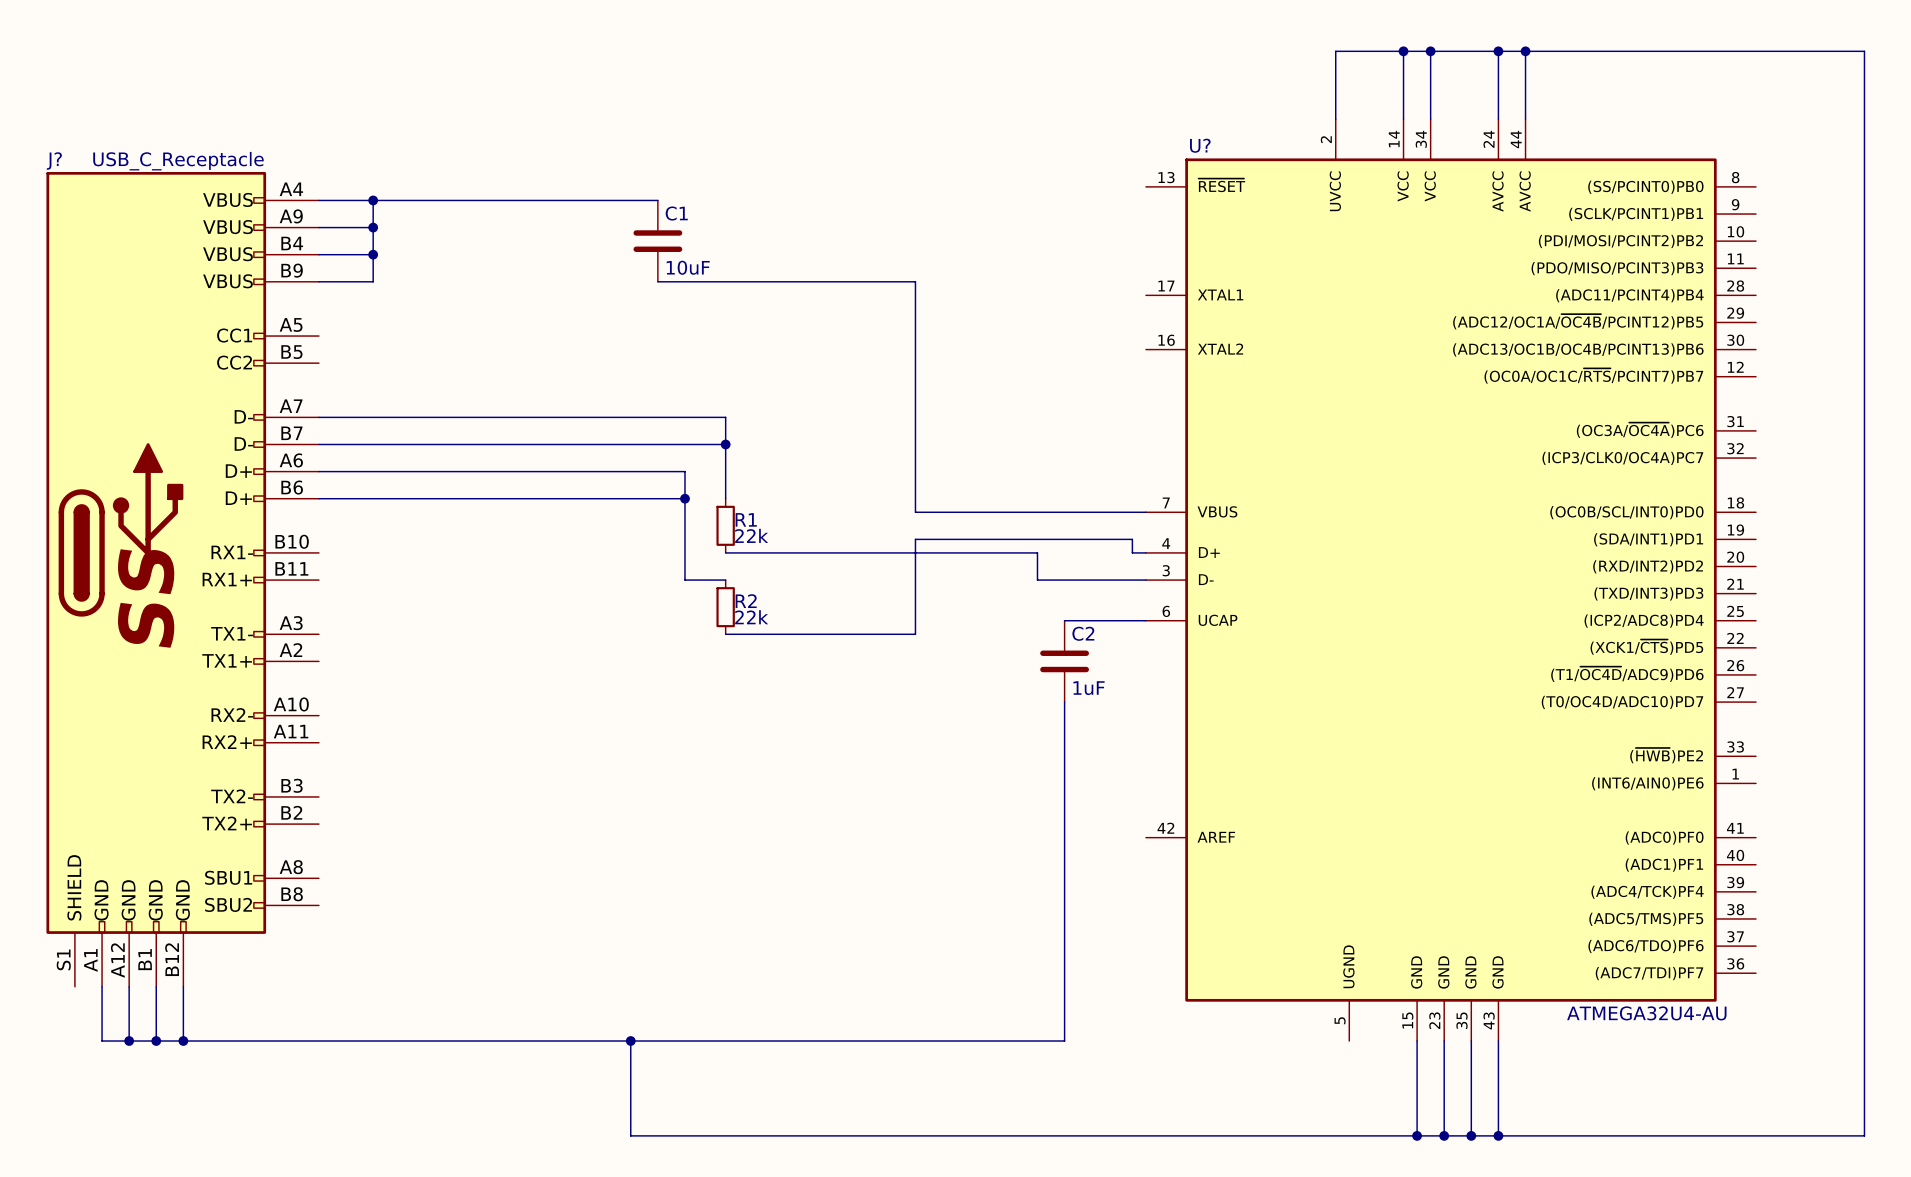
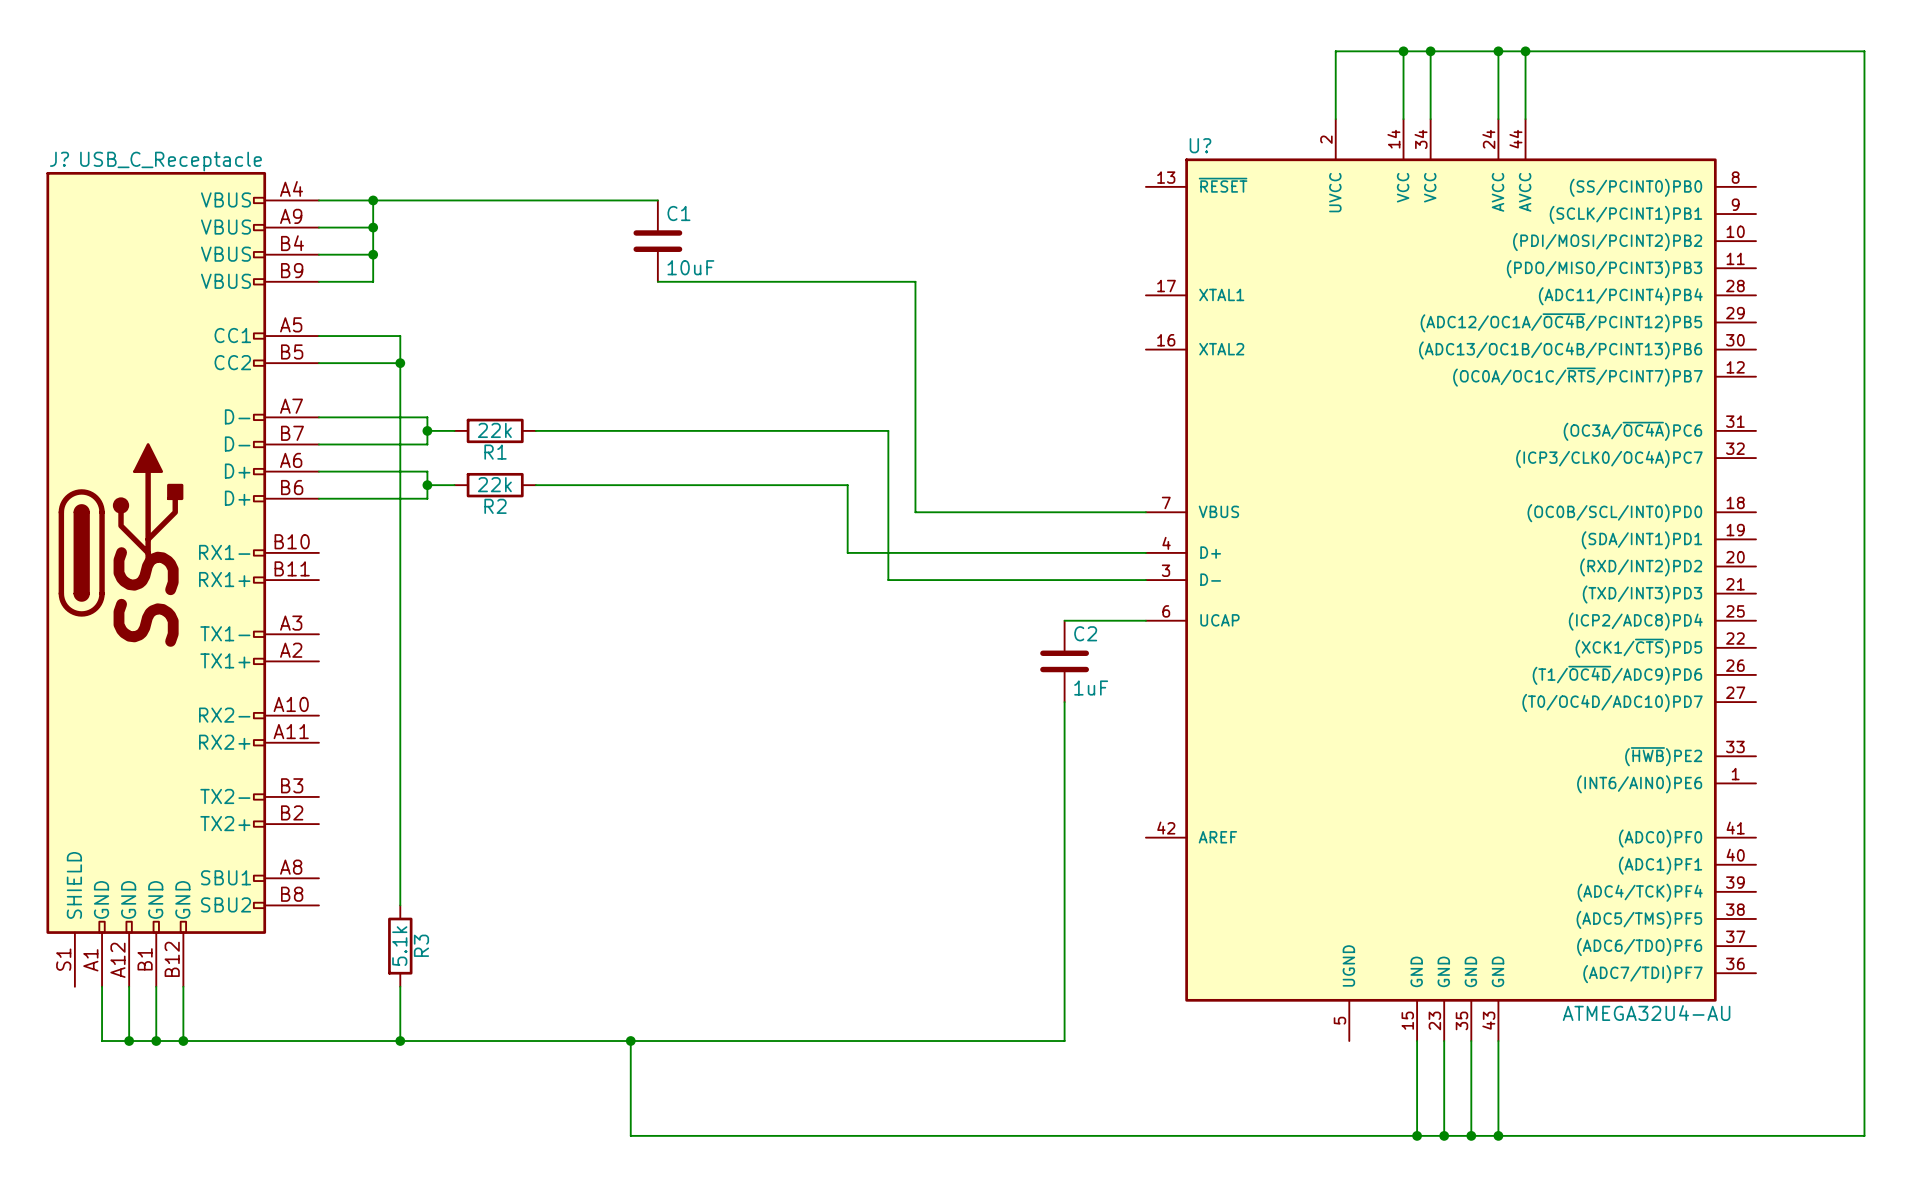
wire: none -> (318, 336) (400, 336) (400, 905)
wire: none -> (318, 363) (400, 363)
junction: none -> (400, 363)
wire: (427, 417) (725, 417) (725, 498) -> none
wire: none -> (427, 430) (454, 430)
junction: none -> (427, 430)
wire: none -> (535, 430) (888, 430) (888, 580) (1037, 580)
wire: (427, 444) (725, 444) -> (427, 444) (427, 417)
junction: (725, 444) -> none
wire: (427, 471) (684, 471) (684, 580) (725, 580) -> none
wire: none -> (427, 485) (454, 485)
junction: none -> (427, 485)
wire: (427, 498) (684, 498) -> (427, 498) (427, 471)
junction: (684, 498) -> none
R1 symbol: [716, 498, 735, 553] -> [454, 418, 536, 444]
R1 name position: R1 (746, 519) -> R1 (495, 452)
R1 value position: 22k (751, 535) -> 22k (494, 430)
wire: (725, 552) (847, 552) -> (535, 485) (847, 485) (847, 552)
wire: (1037, 552) (1037, 580) -> (1037, 552) (1132, 552)
wire: (1132, 552) (1132, 539) (915, 539) (915, 634) (725, 634) -> none
R2 symbol: [716, 580, 735, 635] -> [454, 472, 536, 498]
R2 name position: R2 (746, 601) -> R2 (495, 506)
R2 value position: 22k (751, 617) -> 22k (494, 484)
R3: none -> 5.1k (400, 946)
wire: none -> (400, 986) (400, 1041)
junction: none -> (400, 1041)

